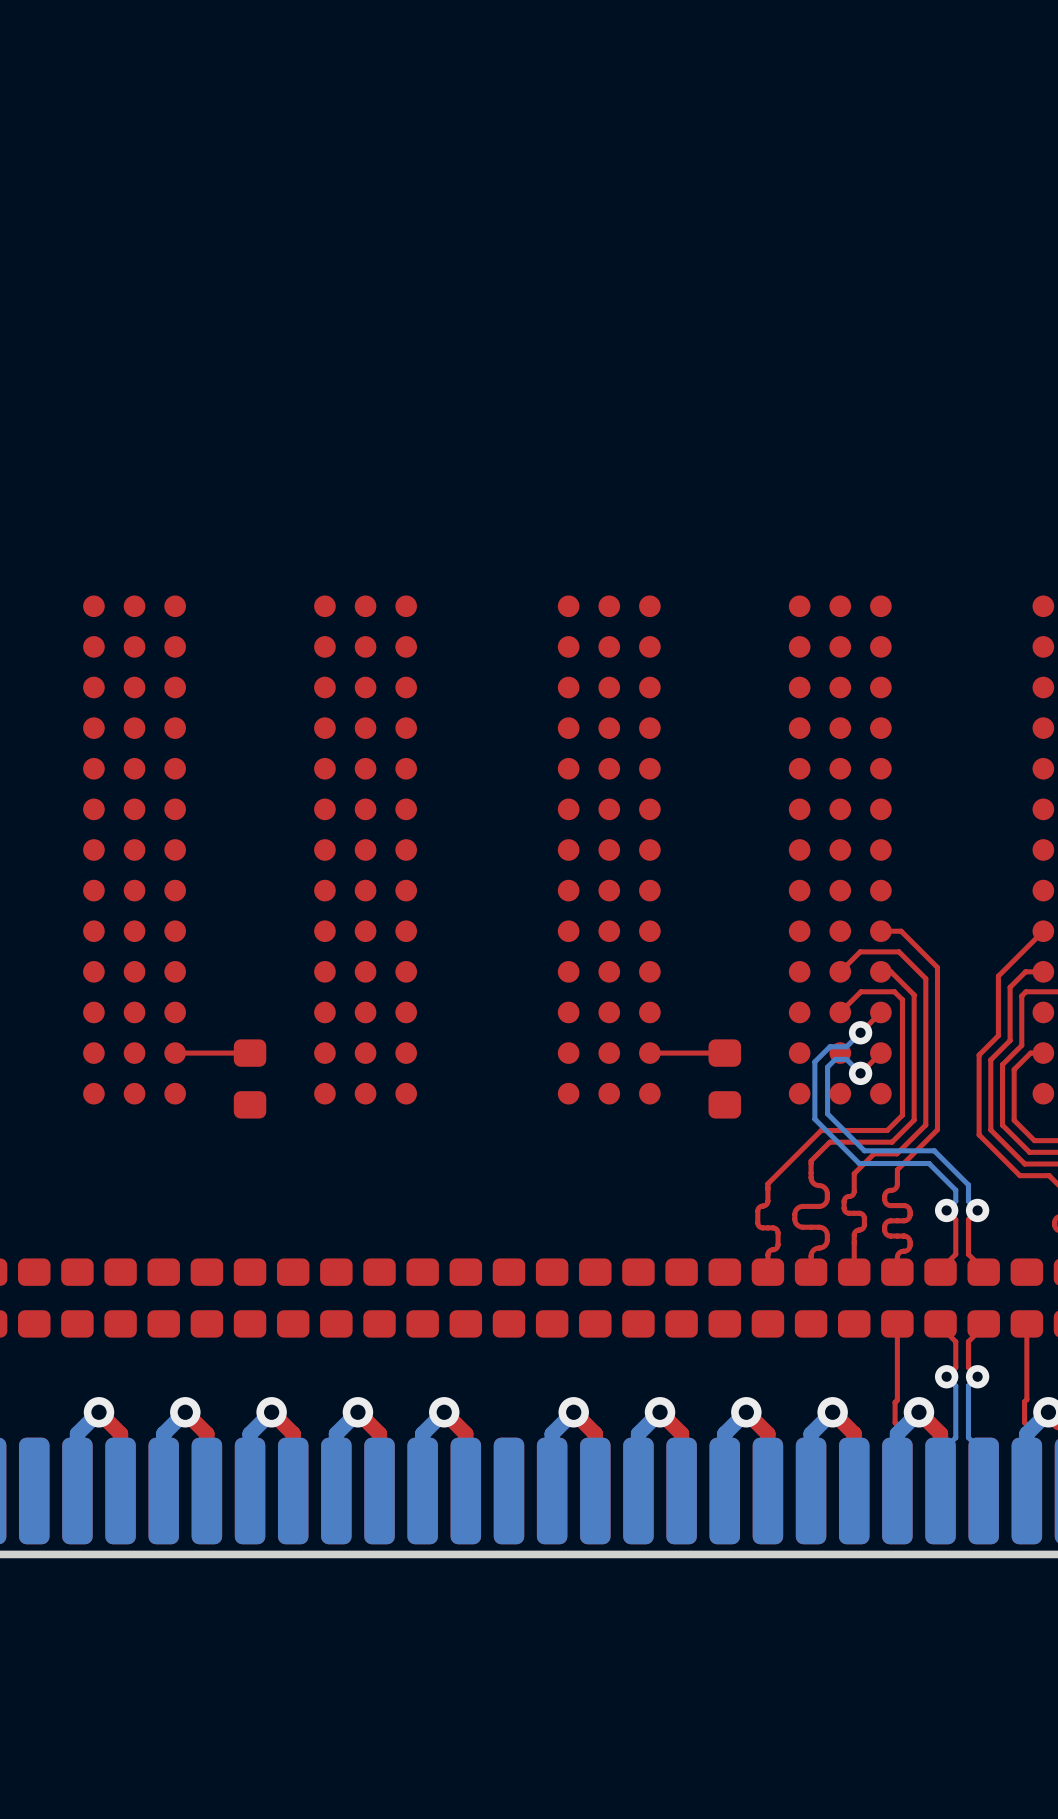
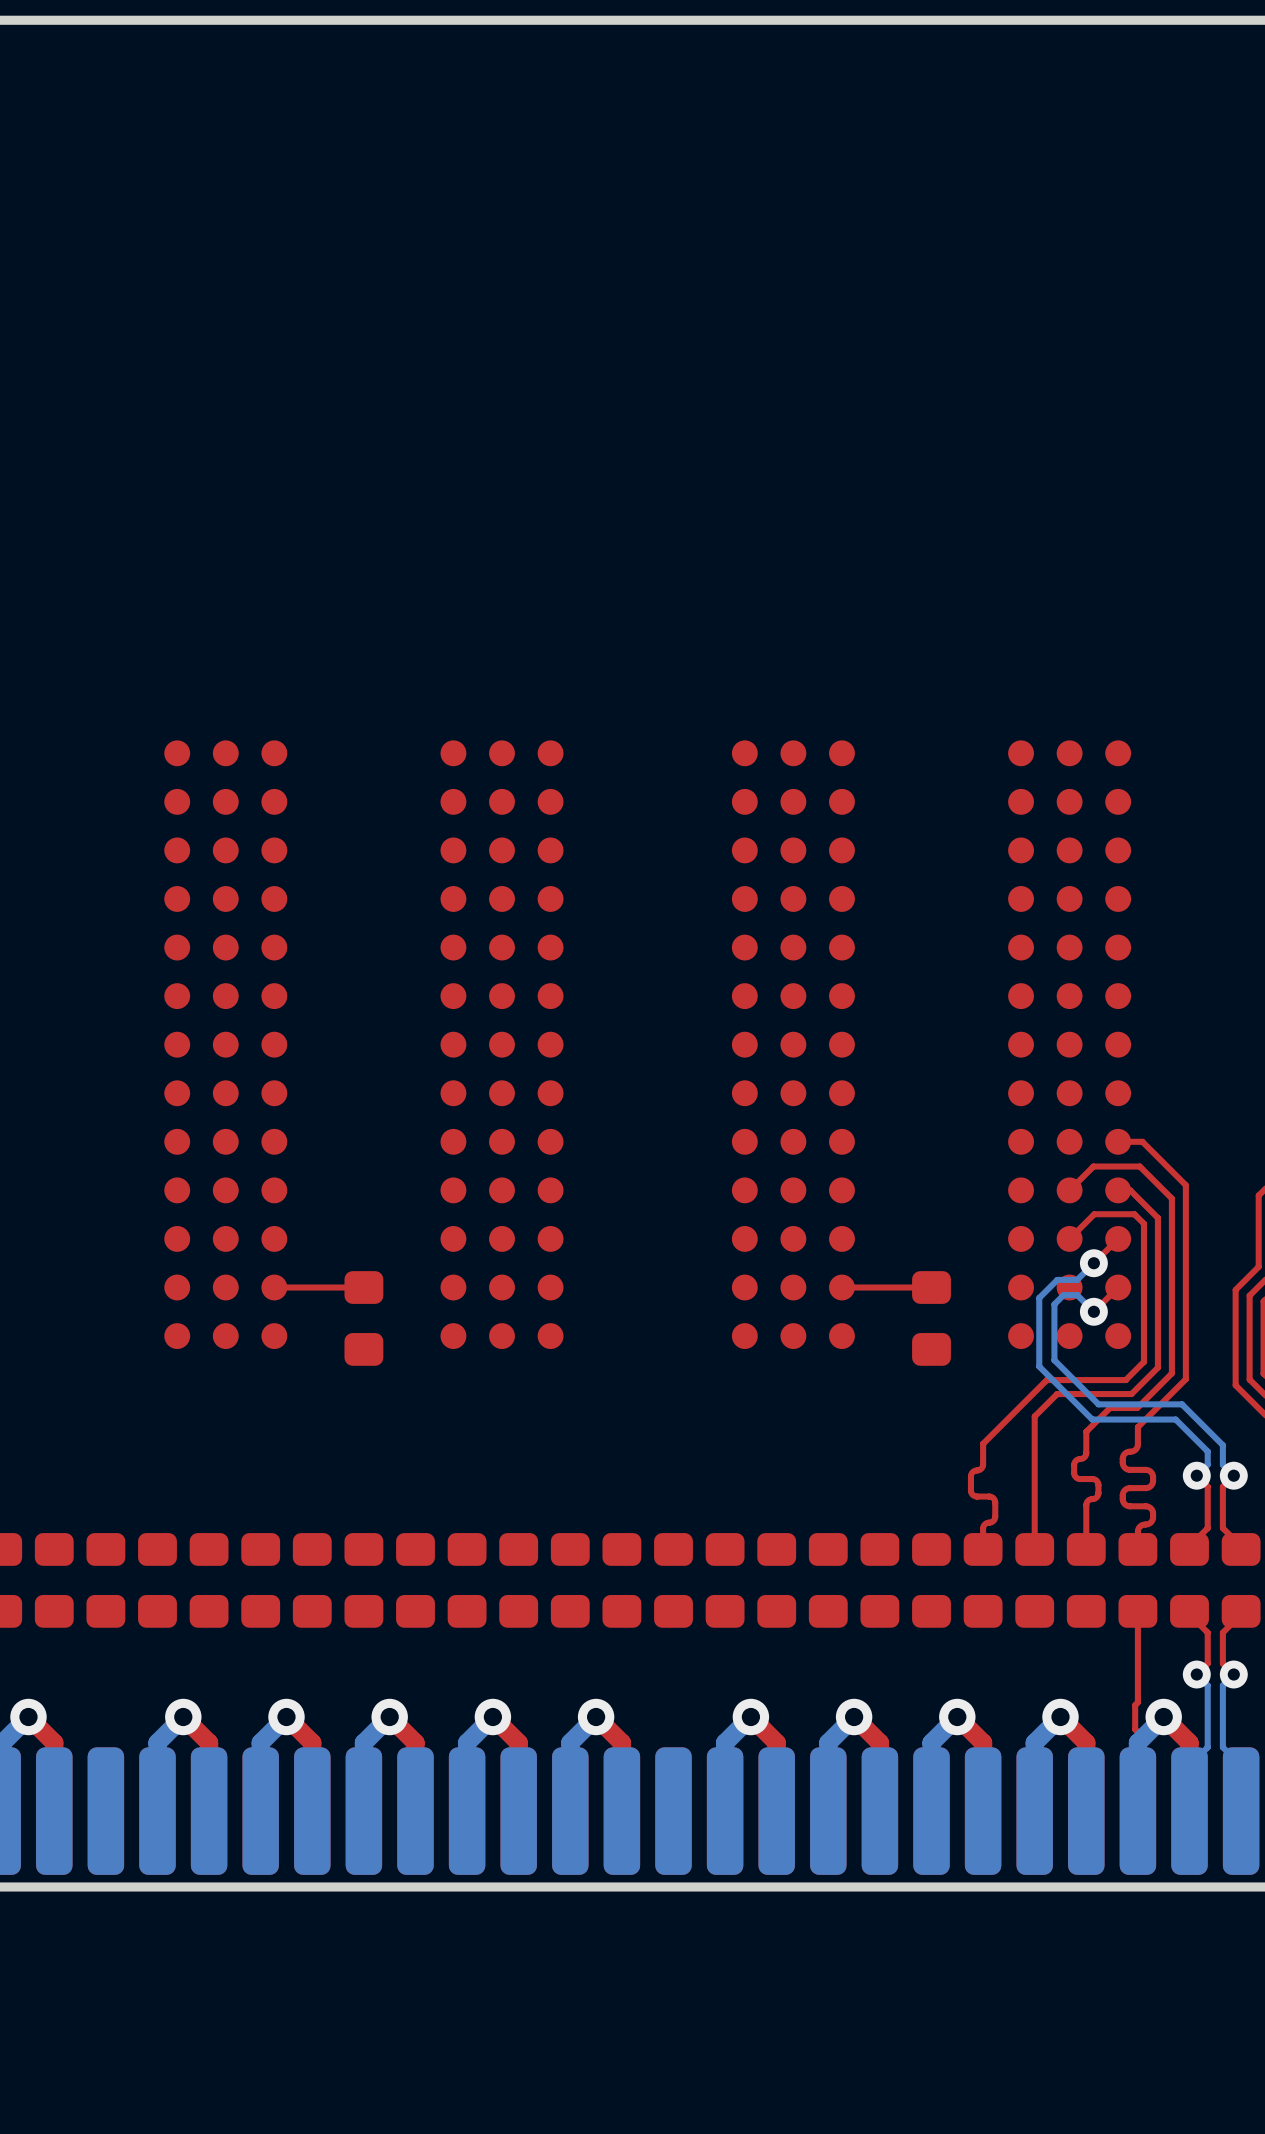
top track: (811, 1177) (814, 1183) (826, 1189) (826, 1201) (821, 1206) (799, 1207) (794, 1214) (795, 1222) (798, 1226) (821, 1227) (826, 1232) (826, 1243) (814, 1249) (811, 1256) -> (1034, 1436) (1034, 1530)

